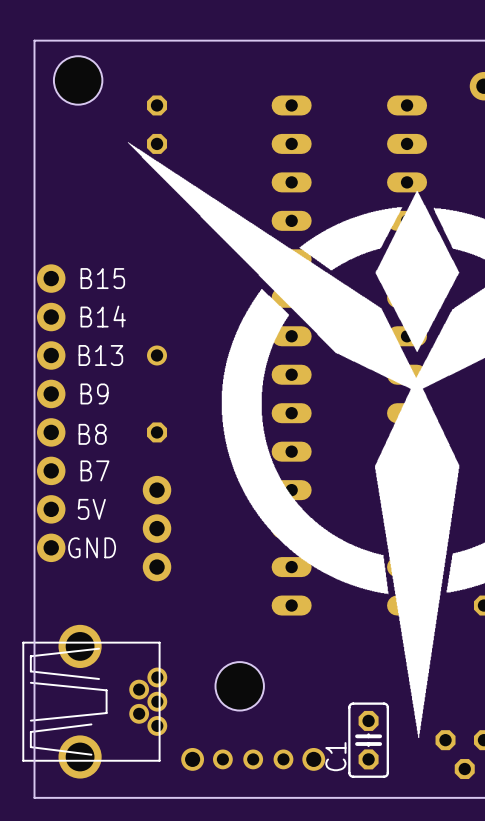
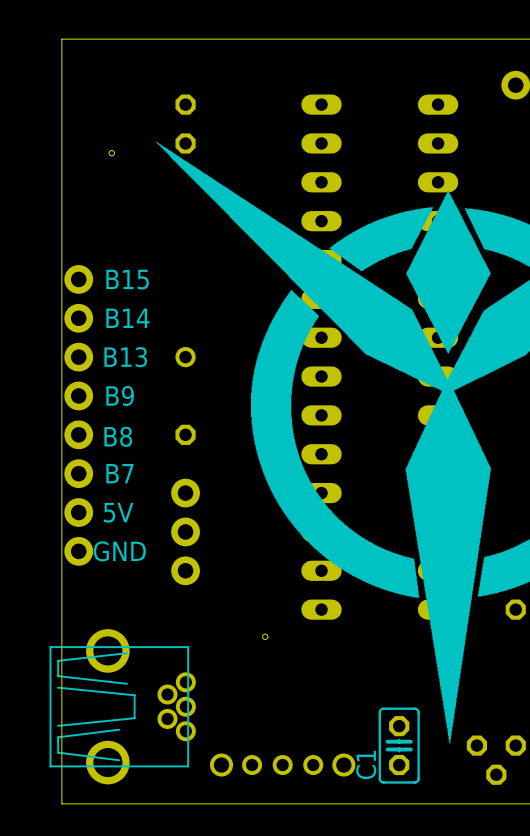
hole: (78, 80) -> none
hole: none -> (111, 153)
hole: none -> (265, 636)
hole: (239, 686) -> none

